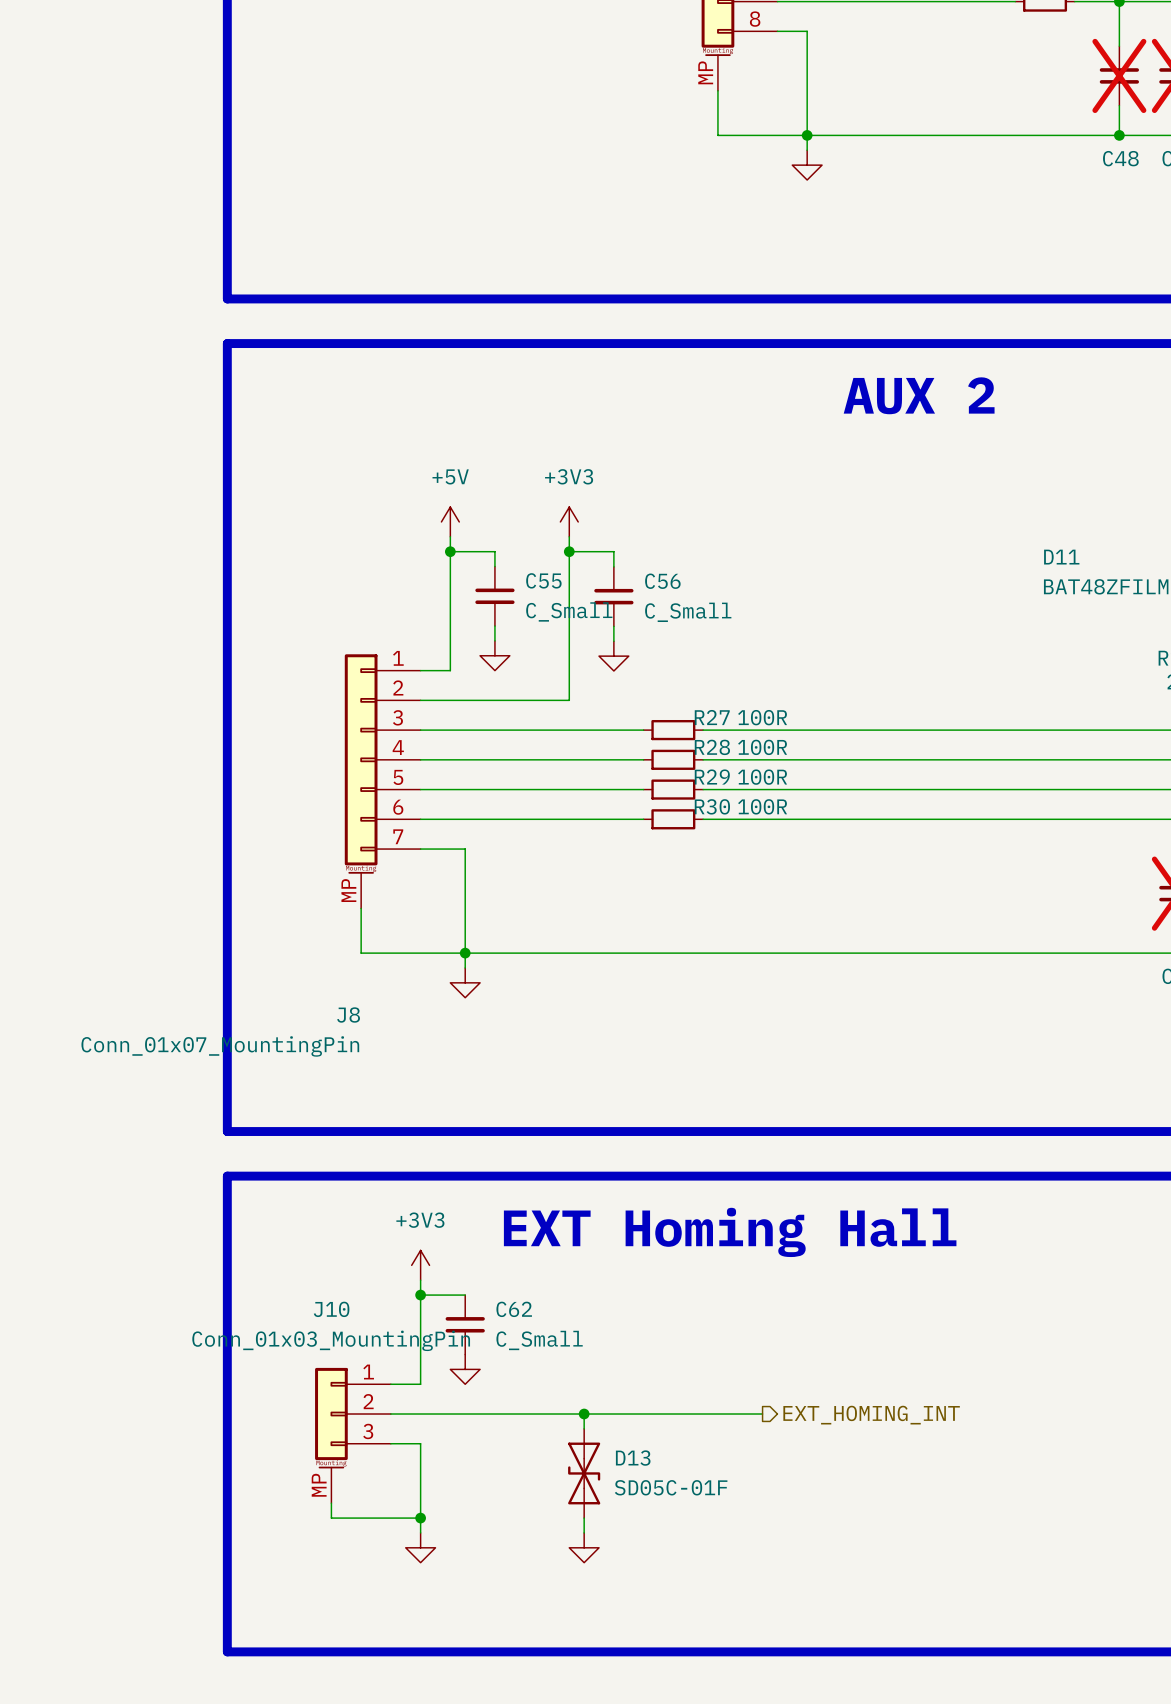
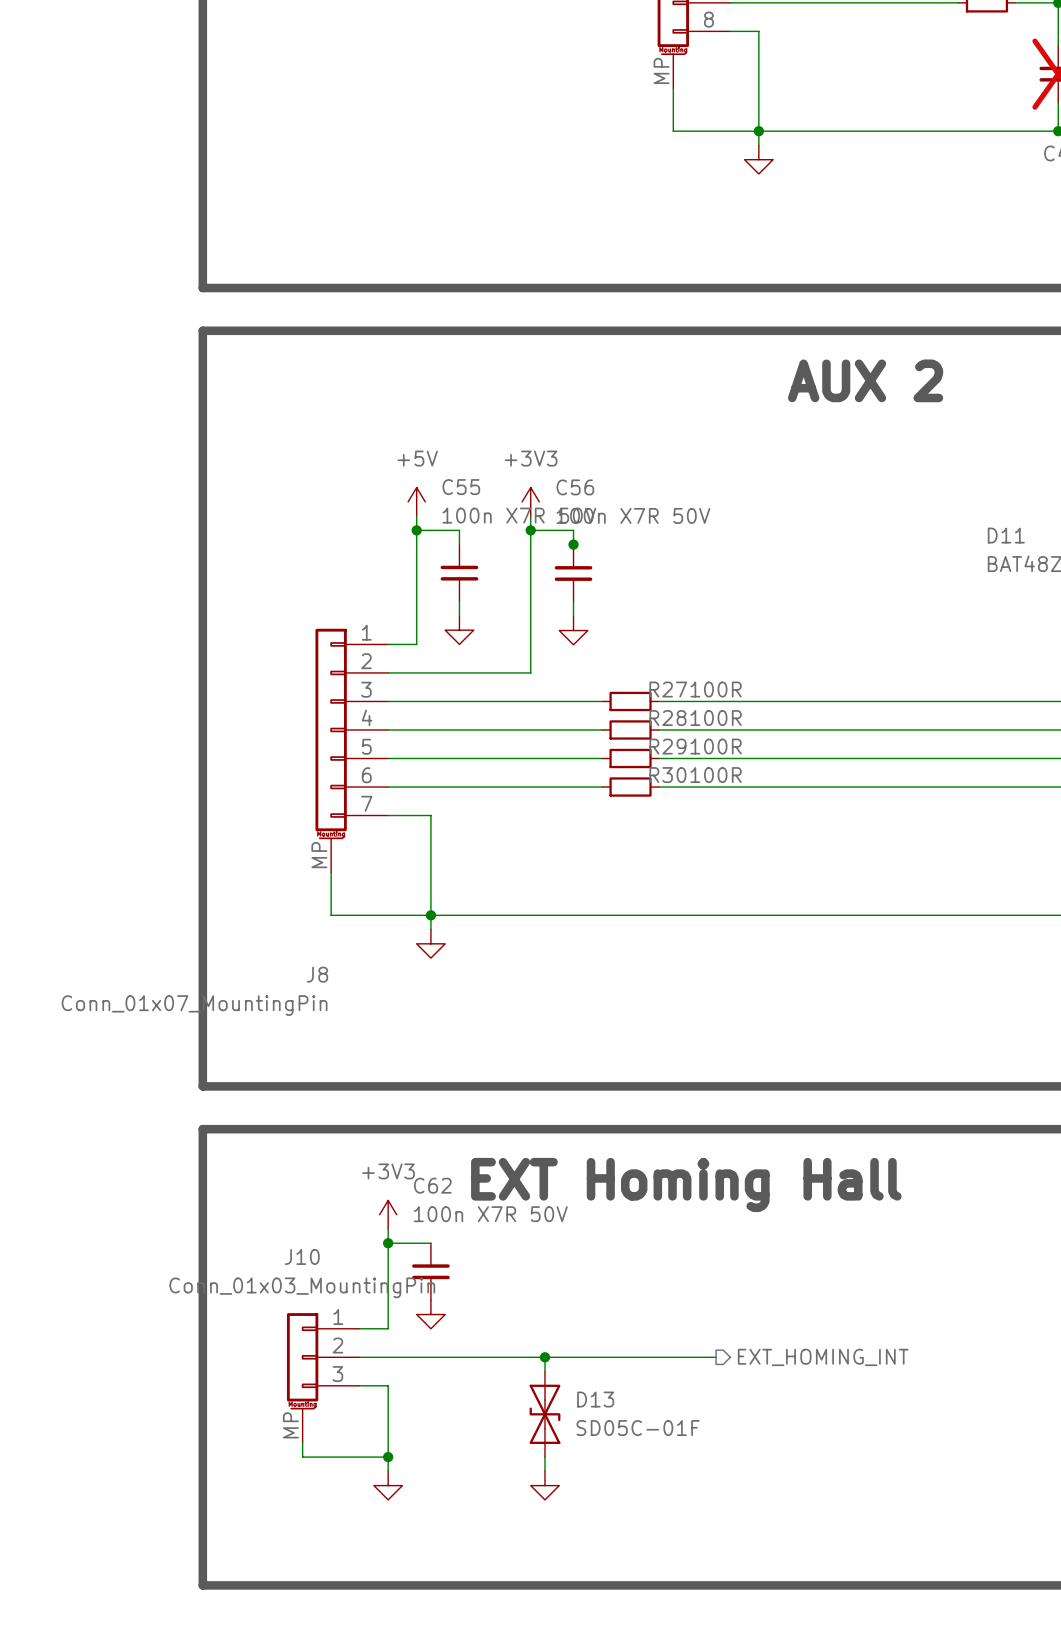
junction: none -> (573, 544)
C55 name position: C55 (543, 580) -> C55 (461, 487)
C56 name position: C56 (662, 581) -> C56 (575, 487)
C55 value: C_Small (569, 611) -> 100n X7R 50V (519, 515)
C56 value: C_Small (688, 612) -> 100n X7R 50V (633, 515)
C62 name position: C62 (514, 1309) -> C62 (432, 1185)
C62 value: C_Small (539, 1340) -> 100n X7R 50V (490, 1214)

